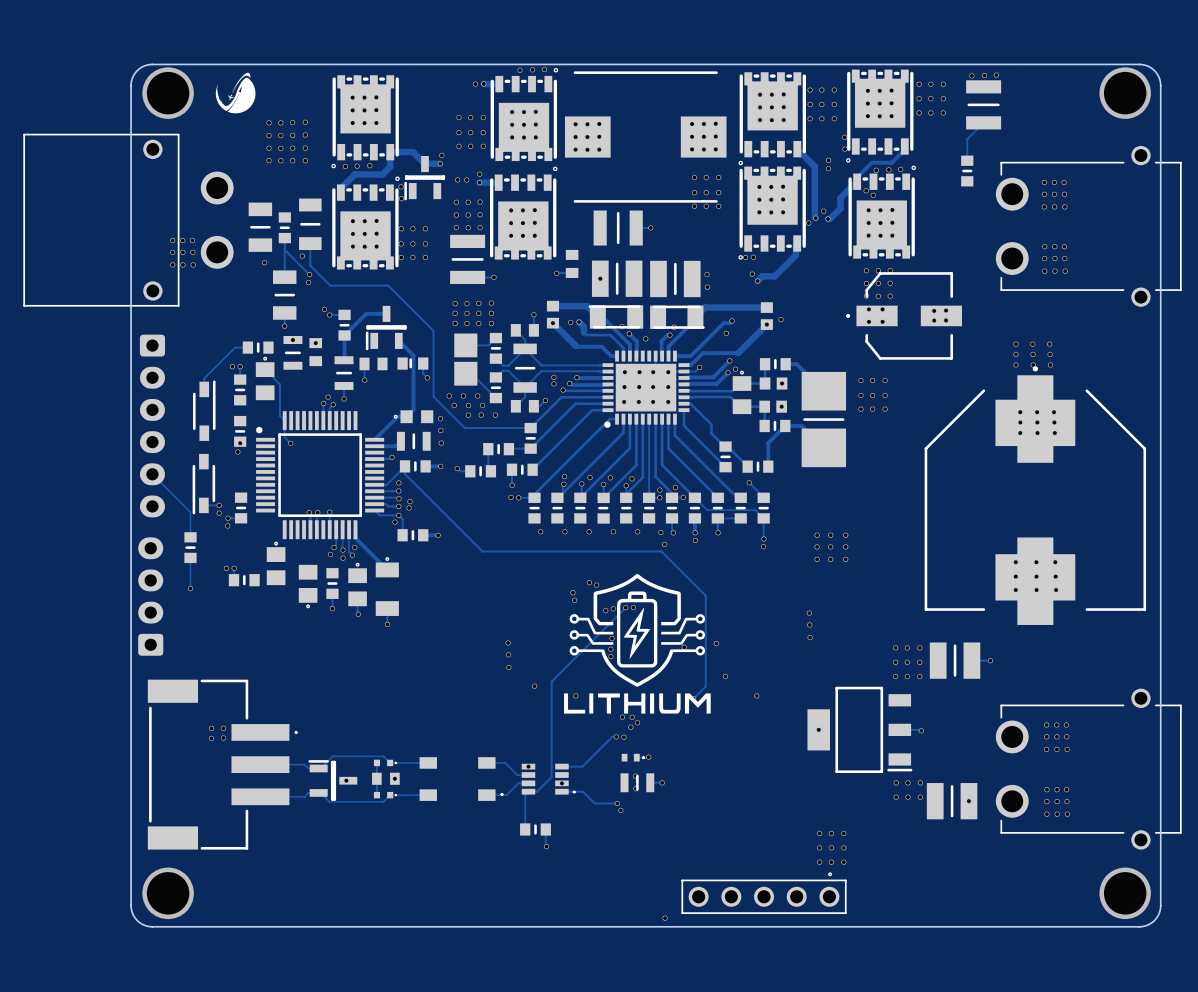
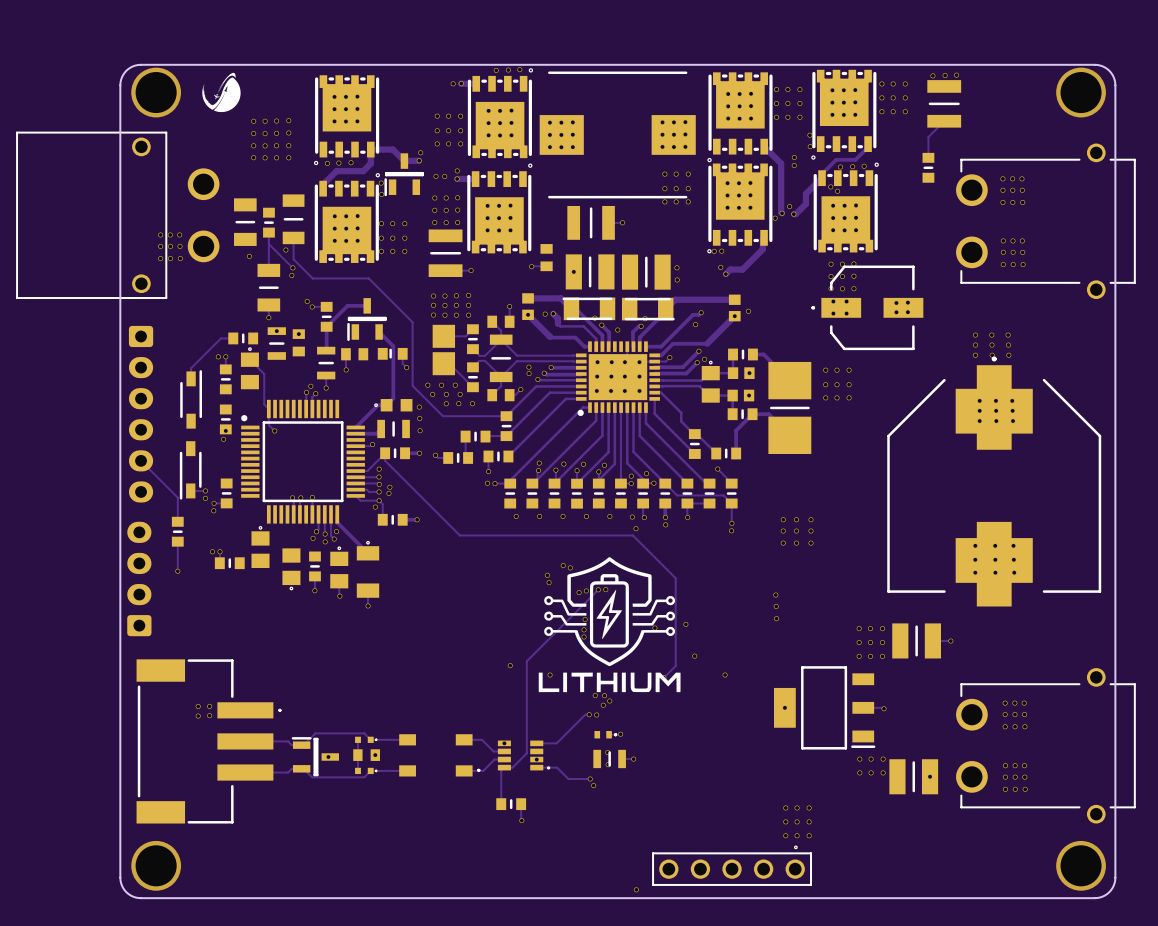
via: (508, 642) -> none
via: (508, 654) -> none
via: (508, 667) -> none

